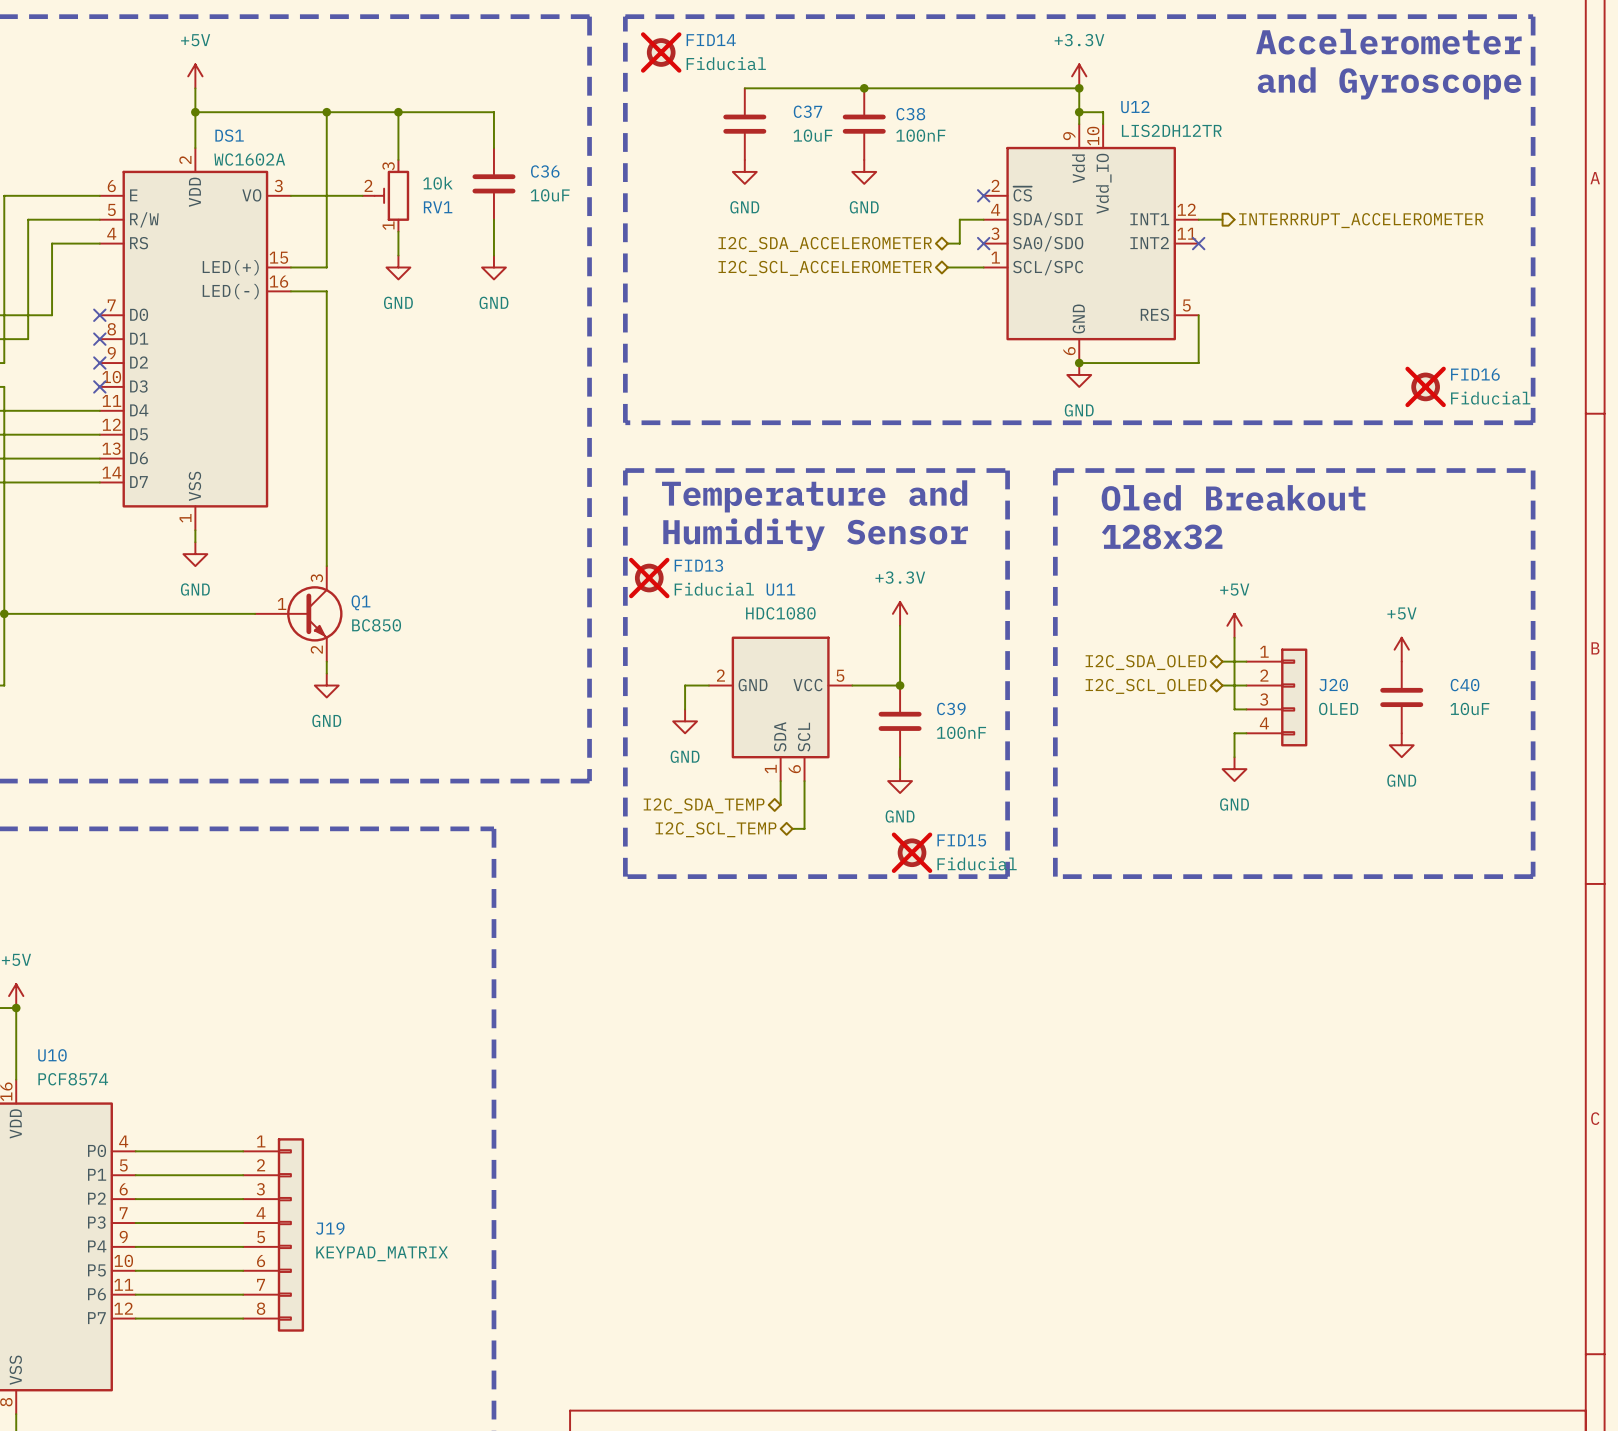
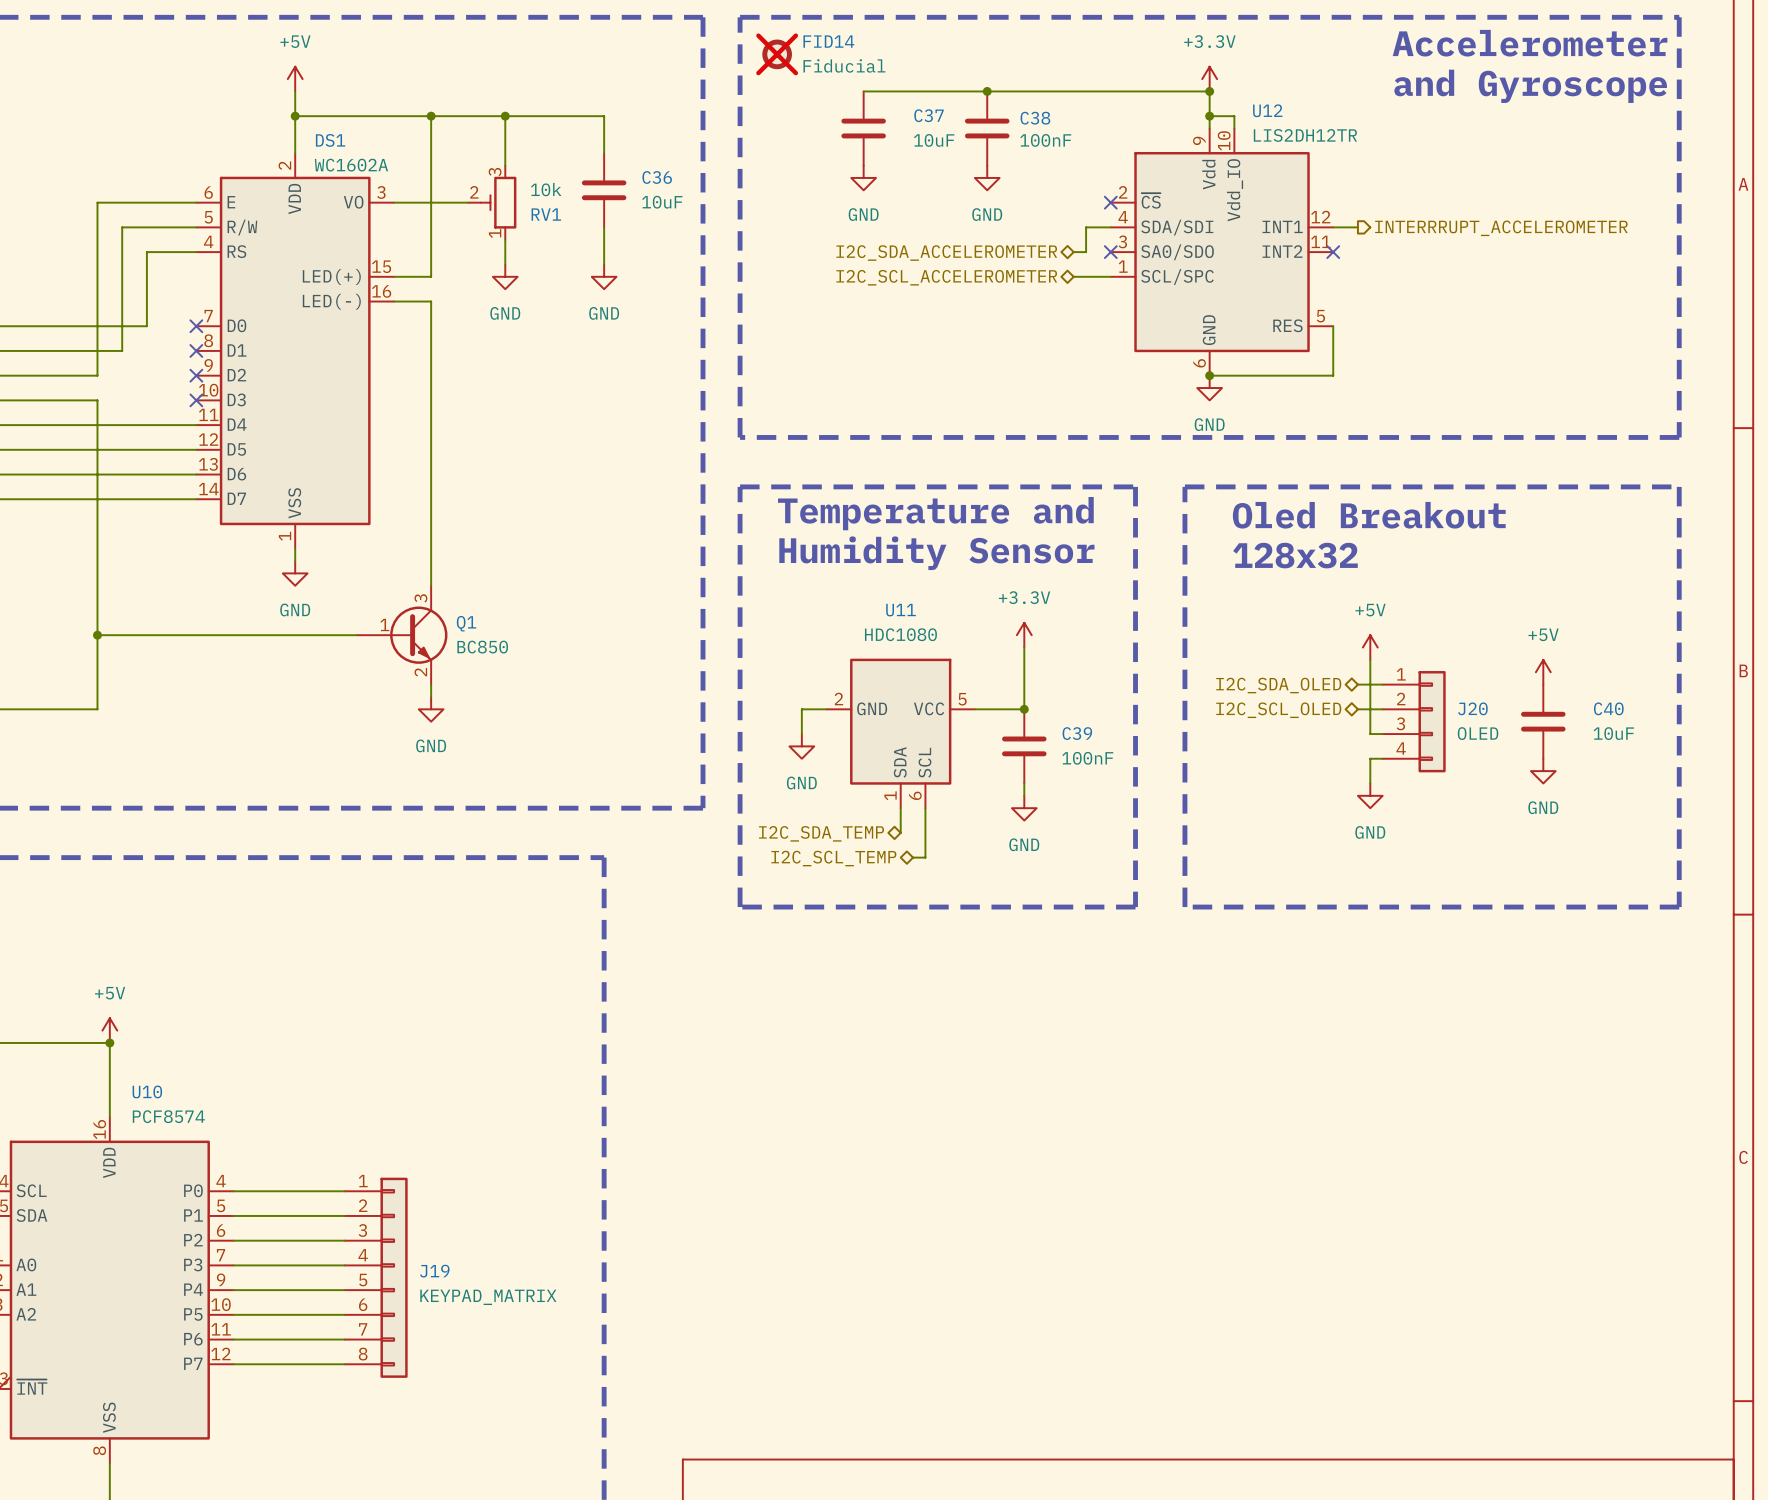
FID16: Fiducial (1425, 386) -> none
FID13: Fiducial (649, 578) -> none
FID15: Fiducial (912, 852) -> none

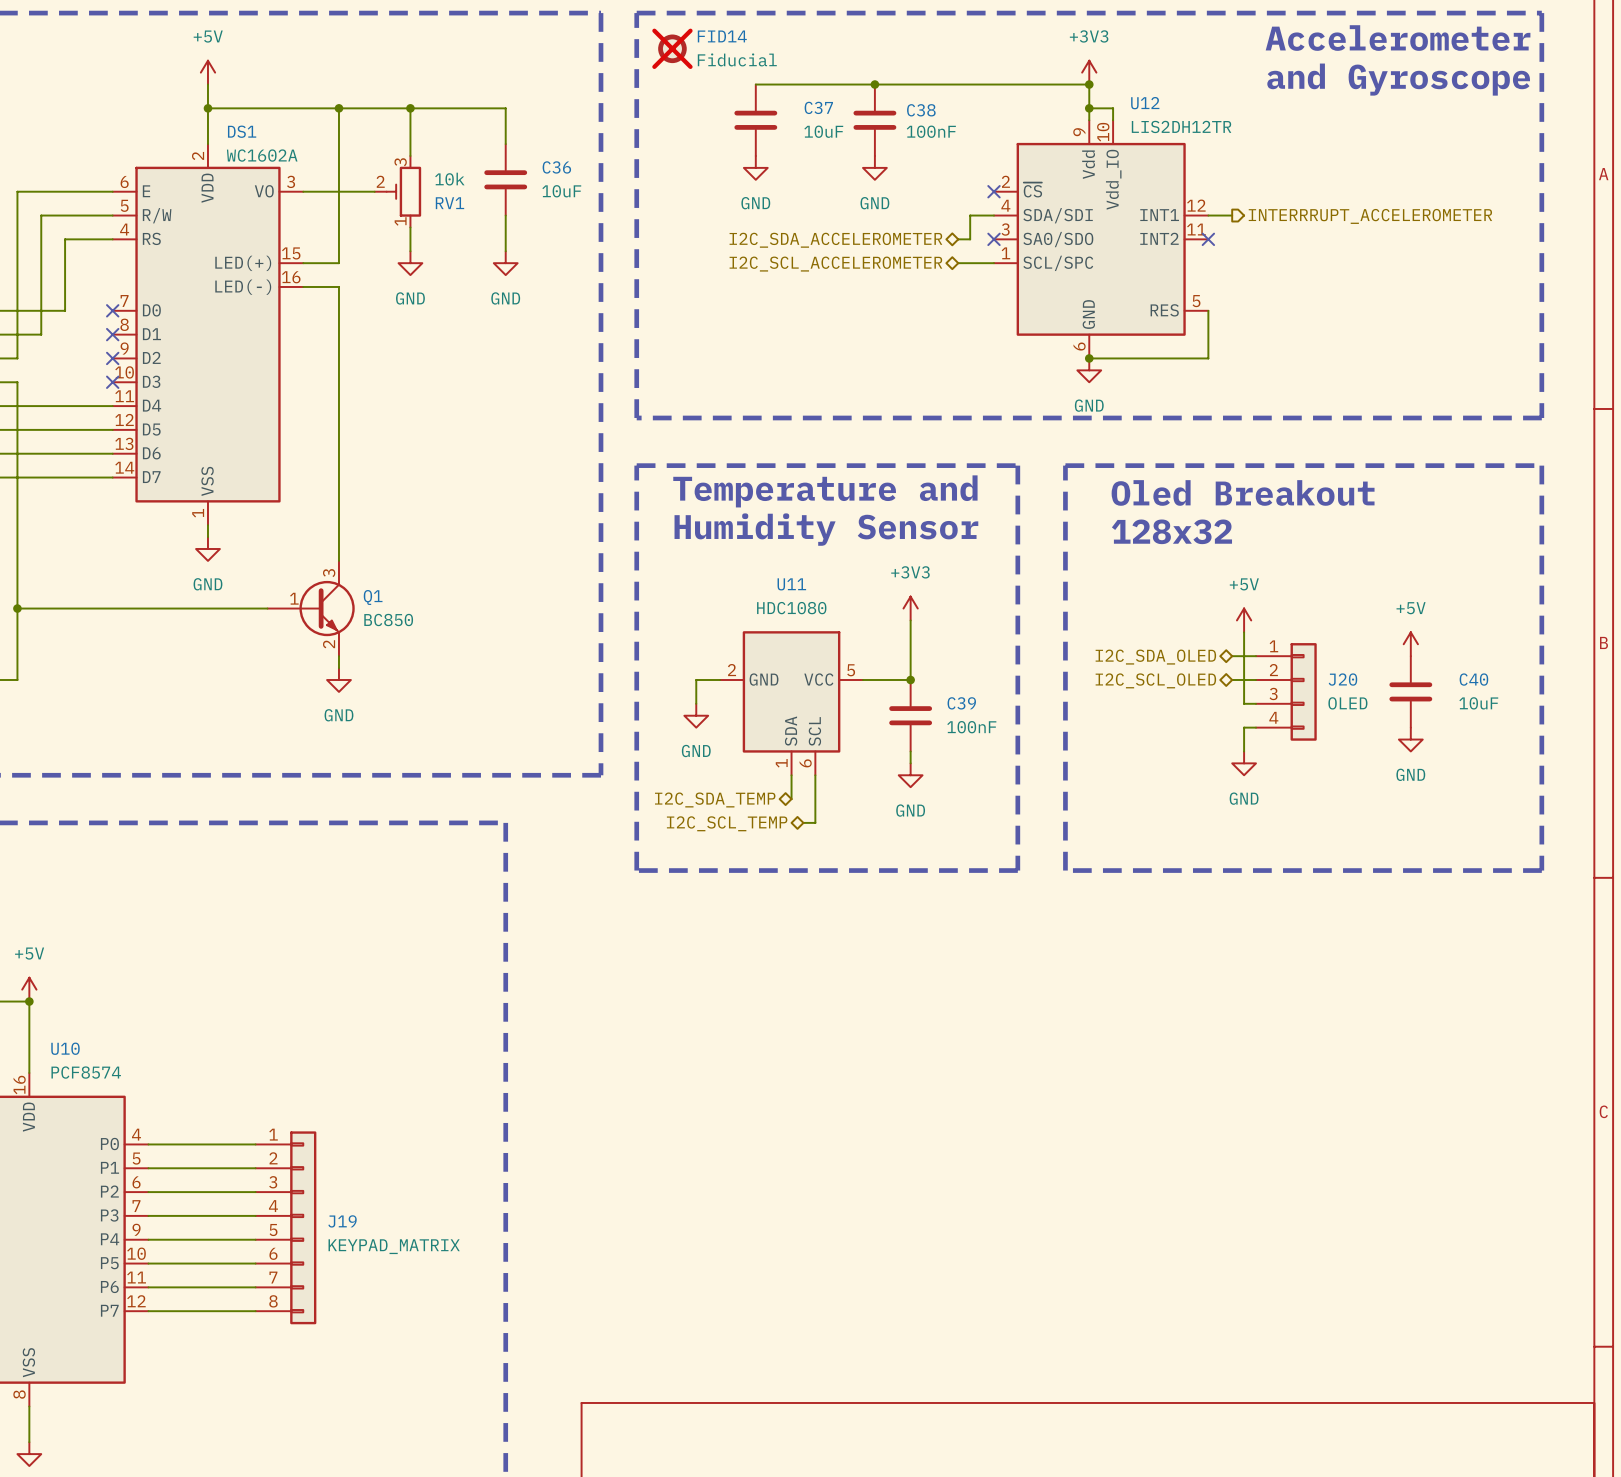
power symbol: +3.3V (1209, 79) -> +3V3 (1089, 72)
power symbol: +3.3V (1024, 635) -> +3V3 (910, 608)

